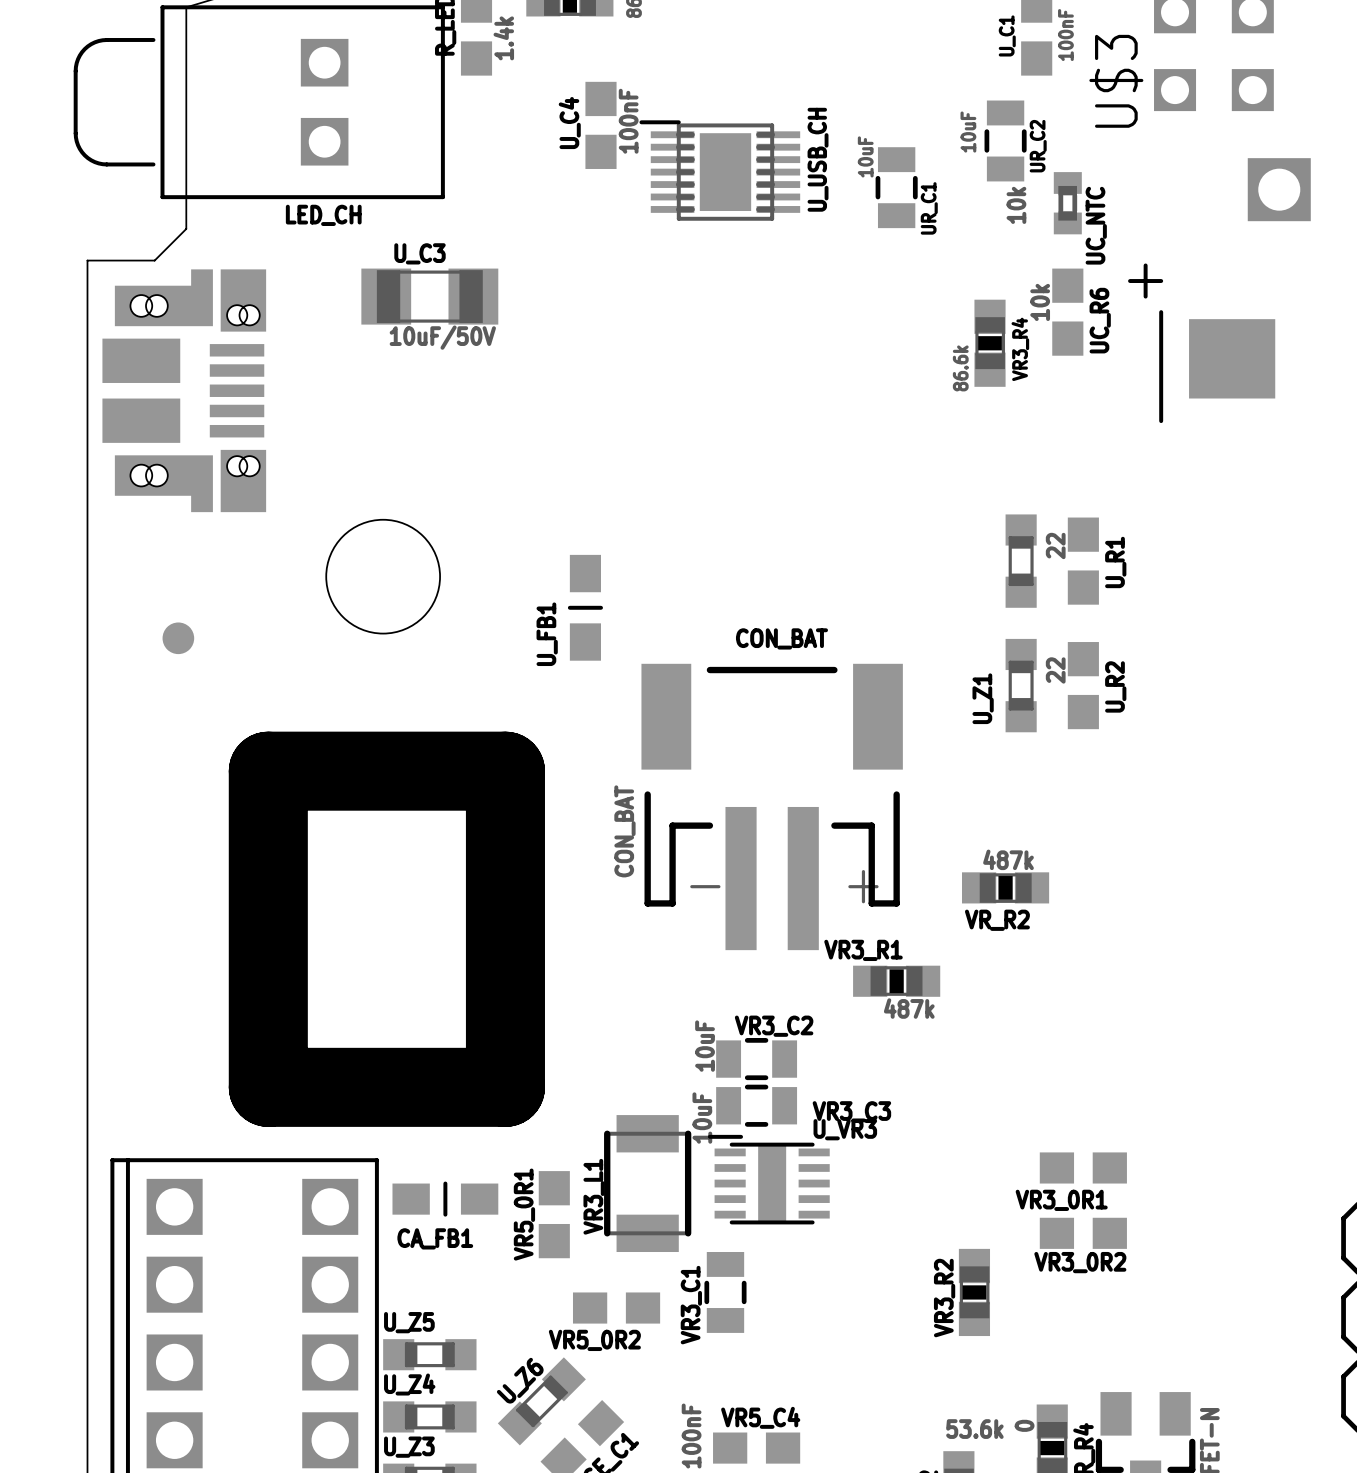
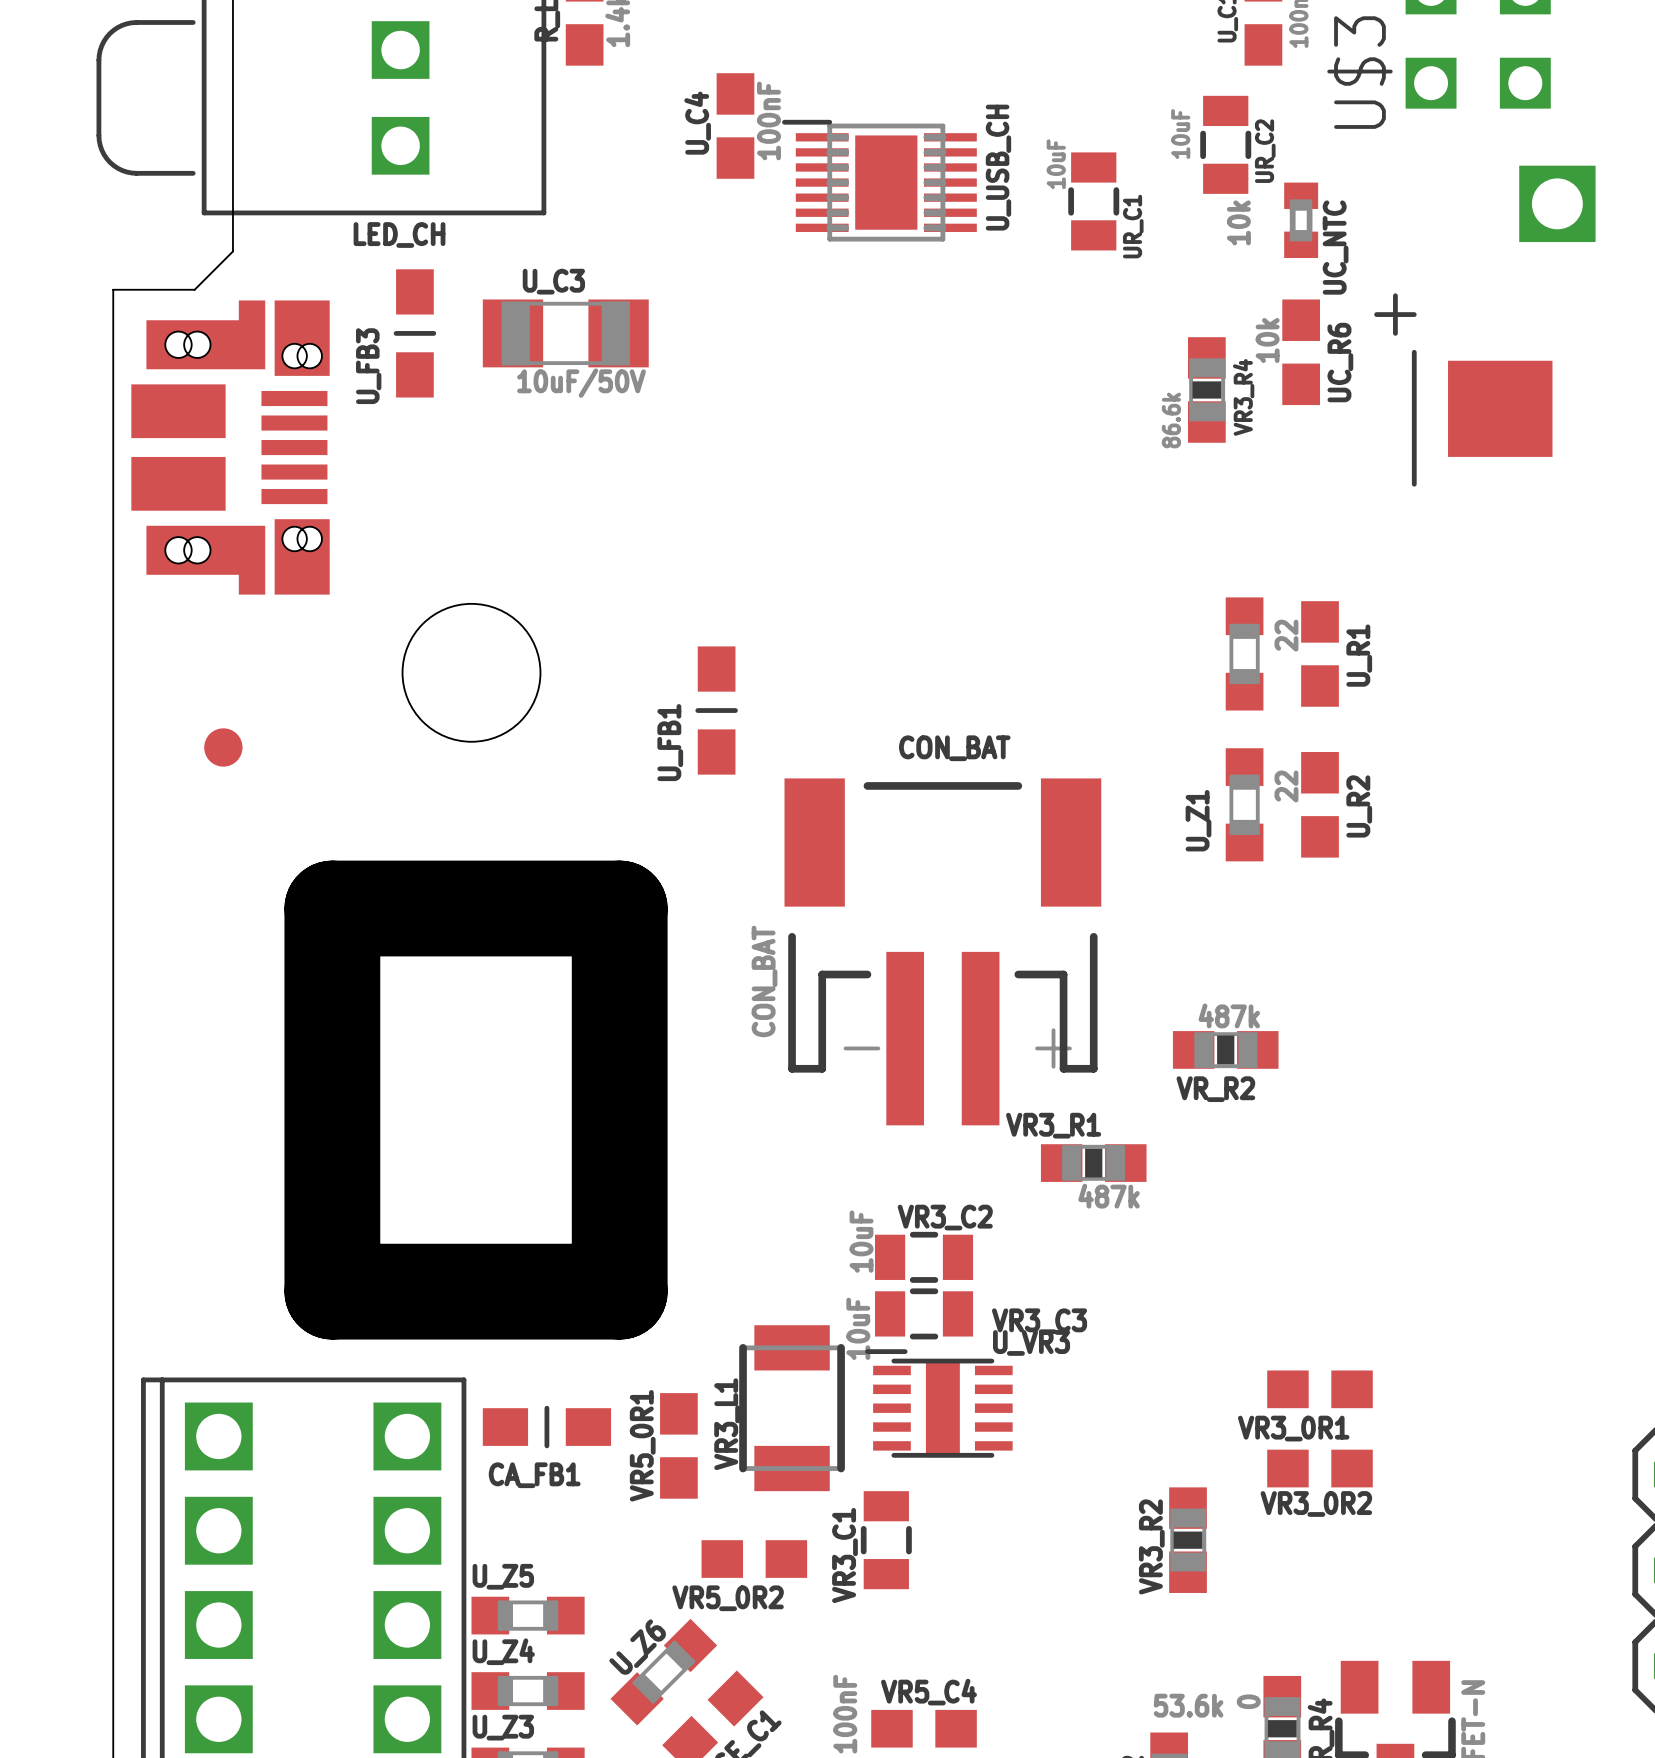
U_FB3: none -> (414, 333)
U_C3 position: (429, 296) -> (565, 333)

